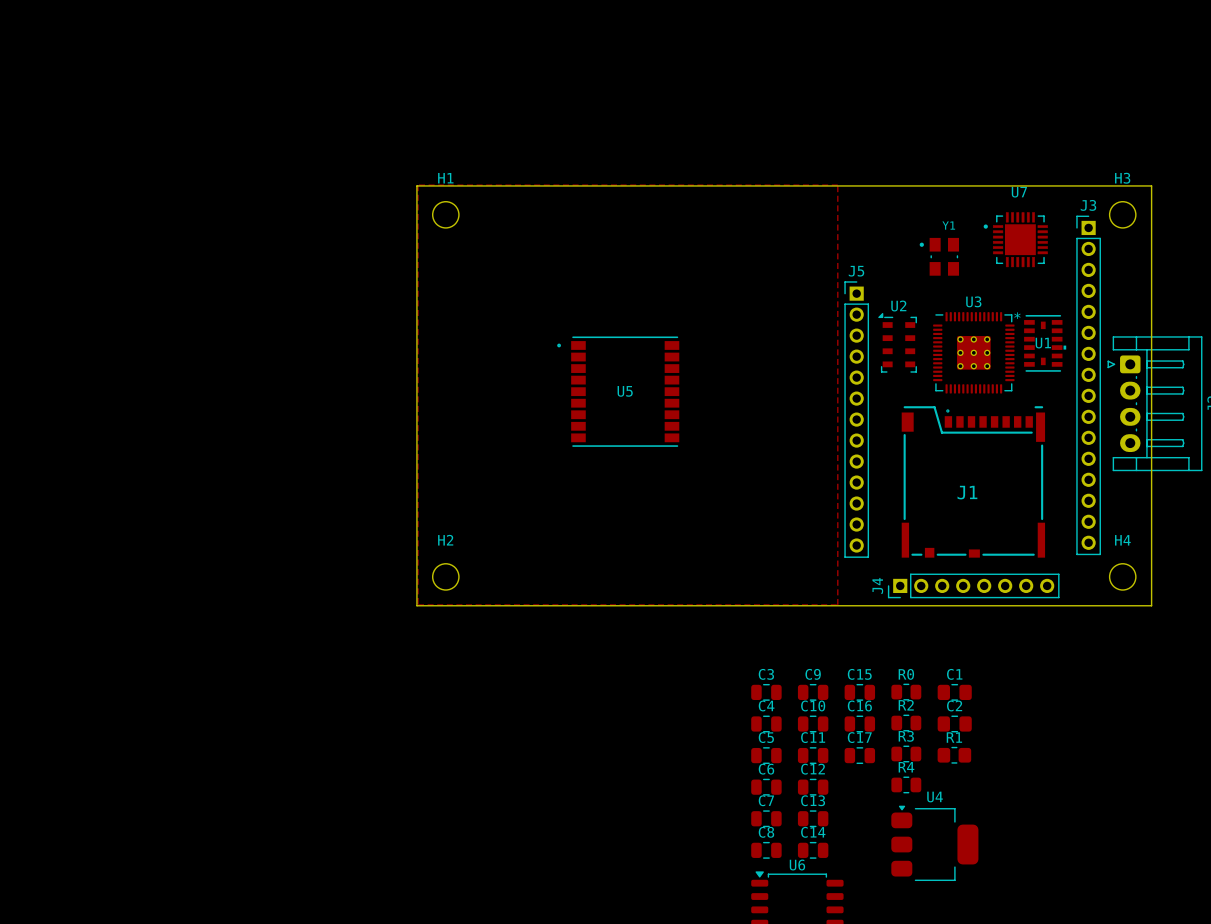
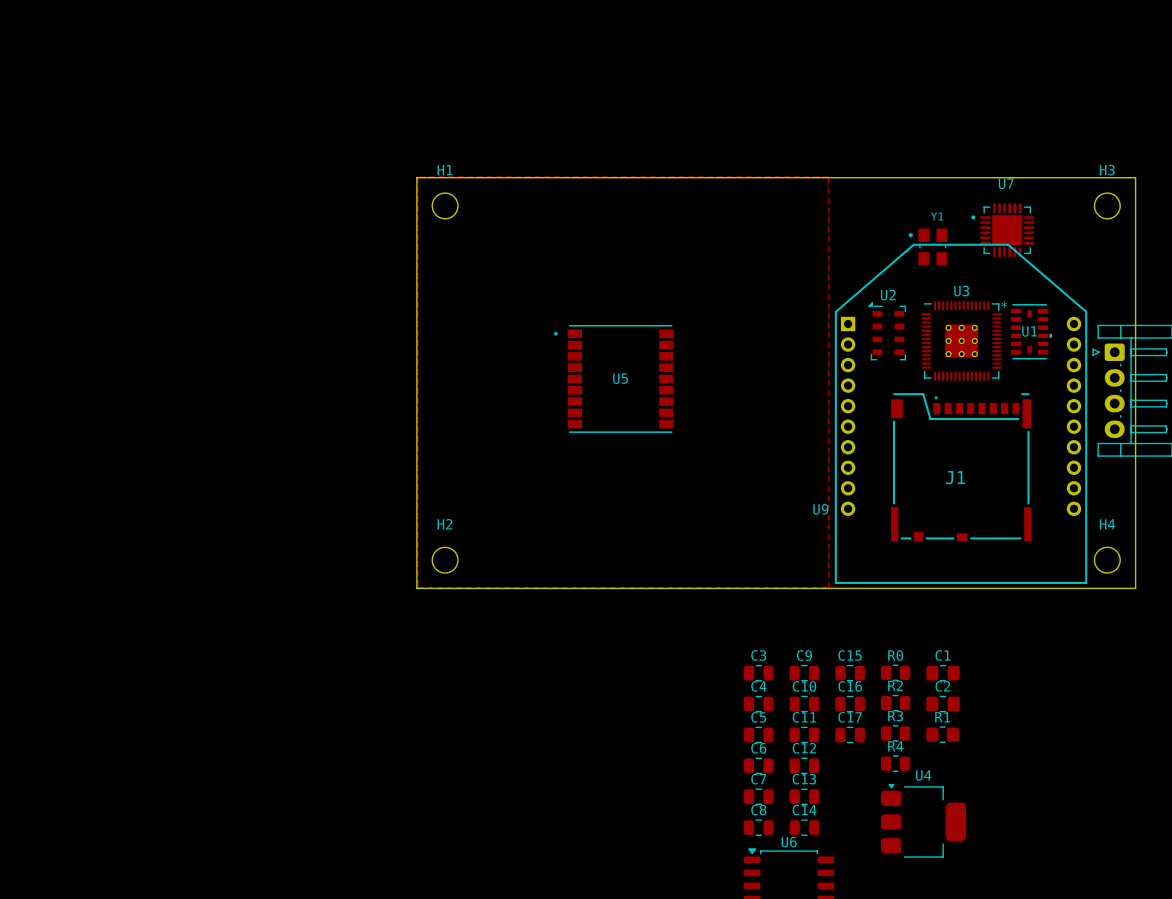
J3: (1088, 385) -> none
J5: (856, 419) -> none
U9: none -> (961, 413)
J4: (973, 585) -> none

